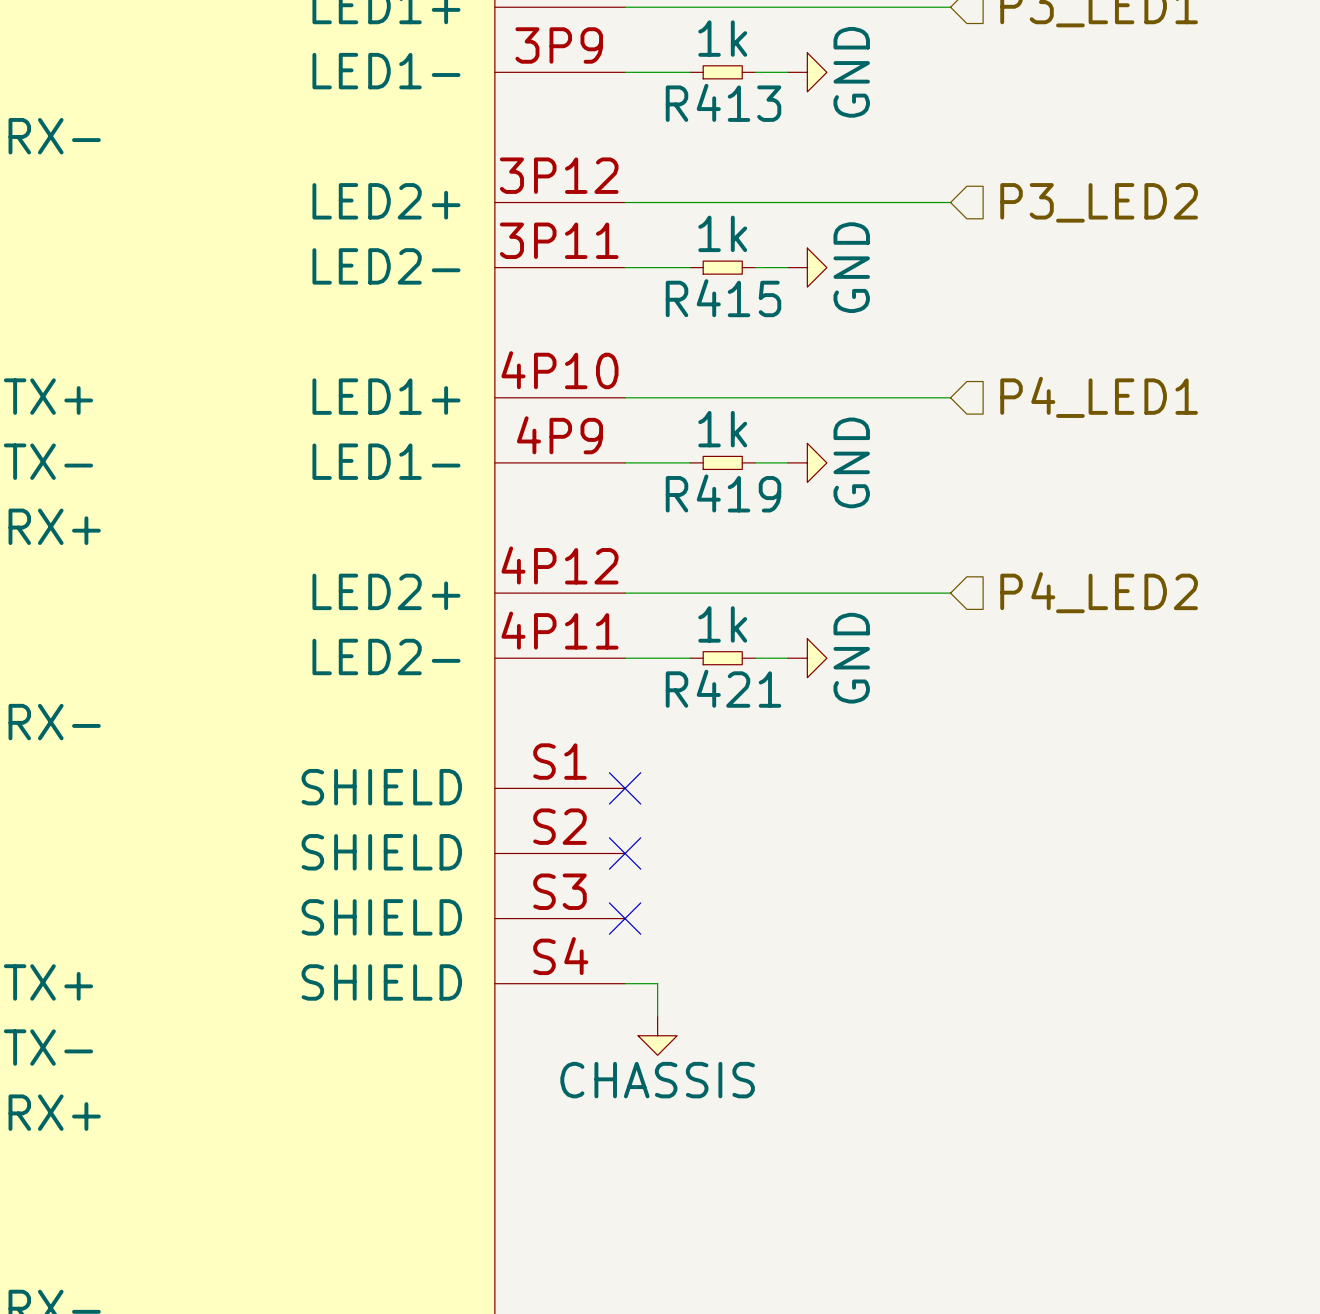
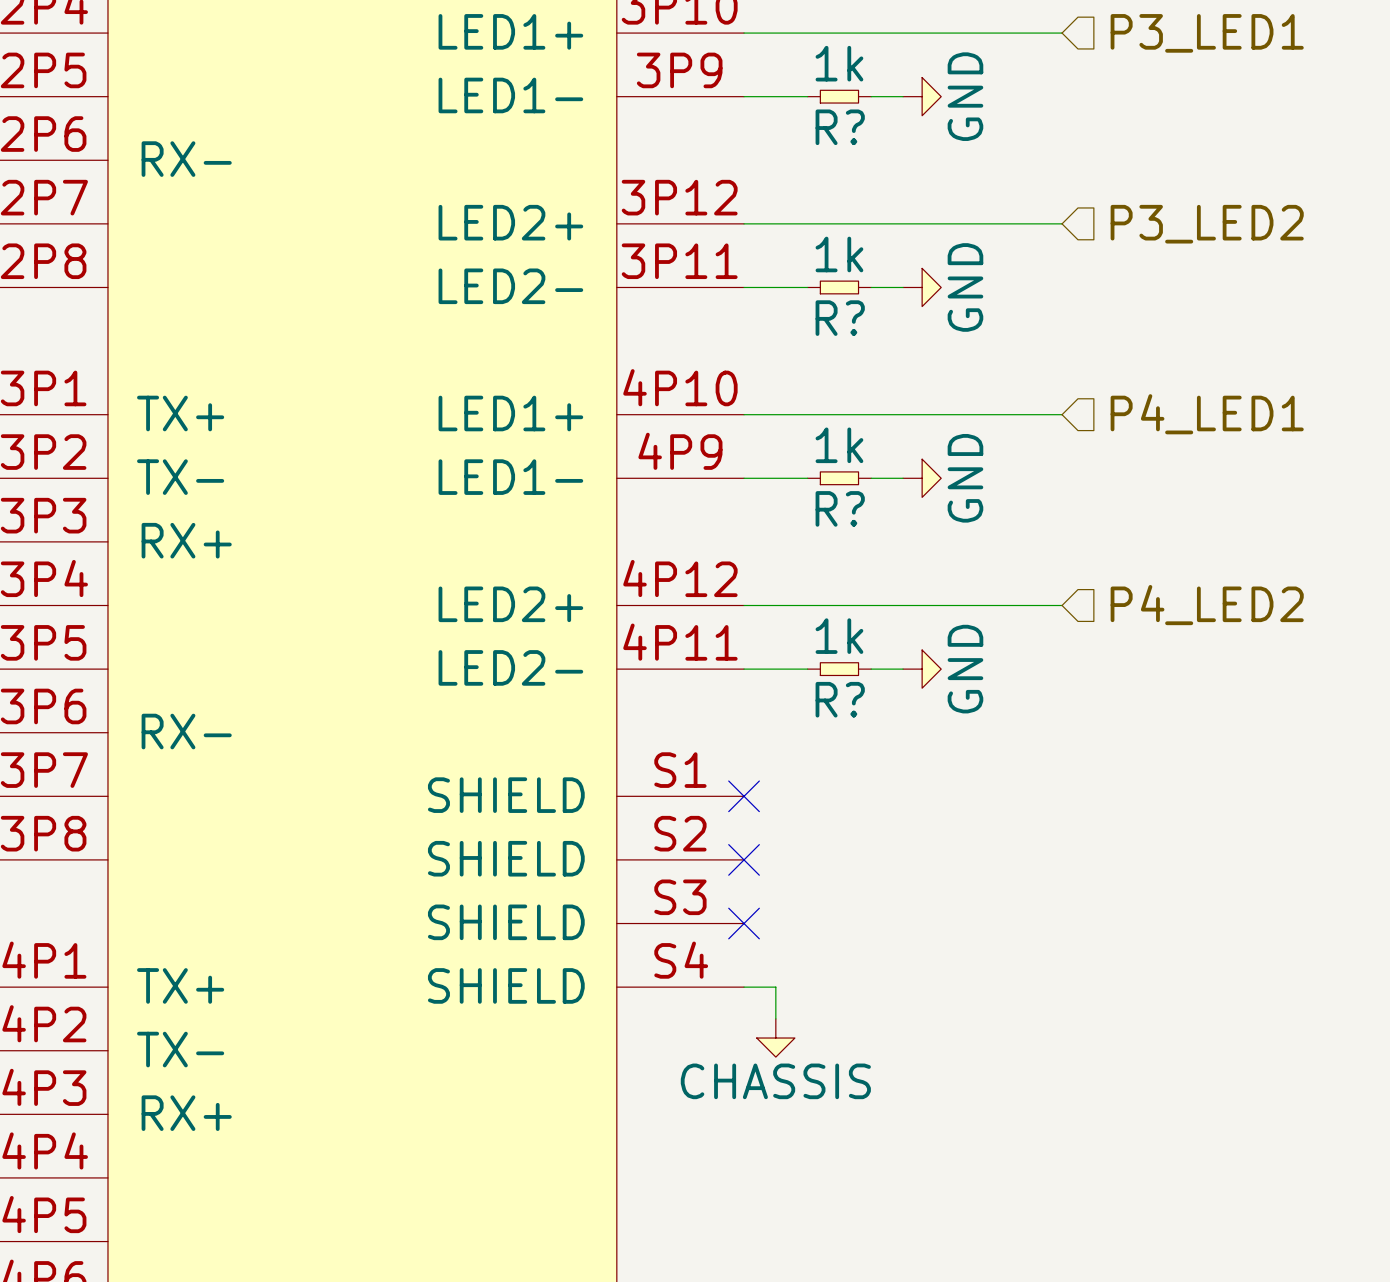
R413 name: R413 (723, 102) -> R? (840, 127)
R415 name: R415 (723, 298) -> R? (840, 318)
R419 name: R419 (723, 493) -> R? (840, 508)
R421 name: R421 (723, 688) -> R? (840, 699)

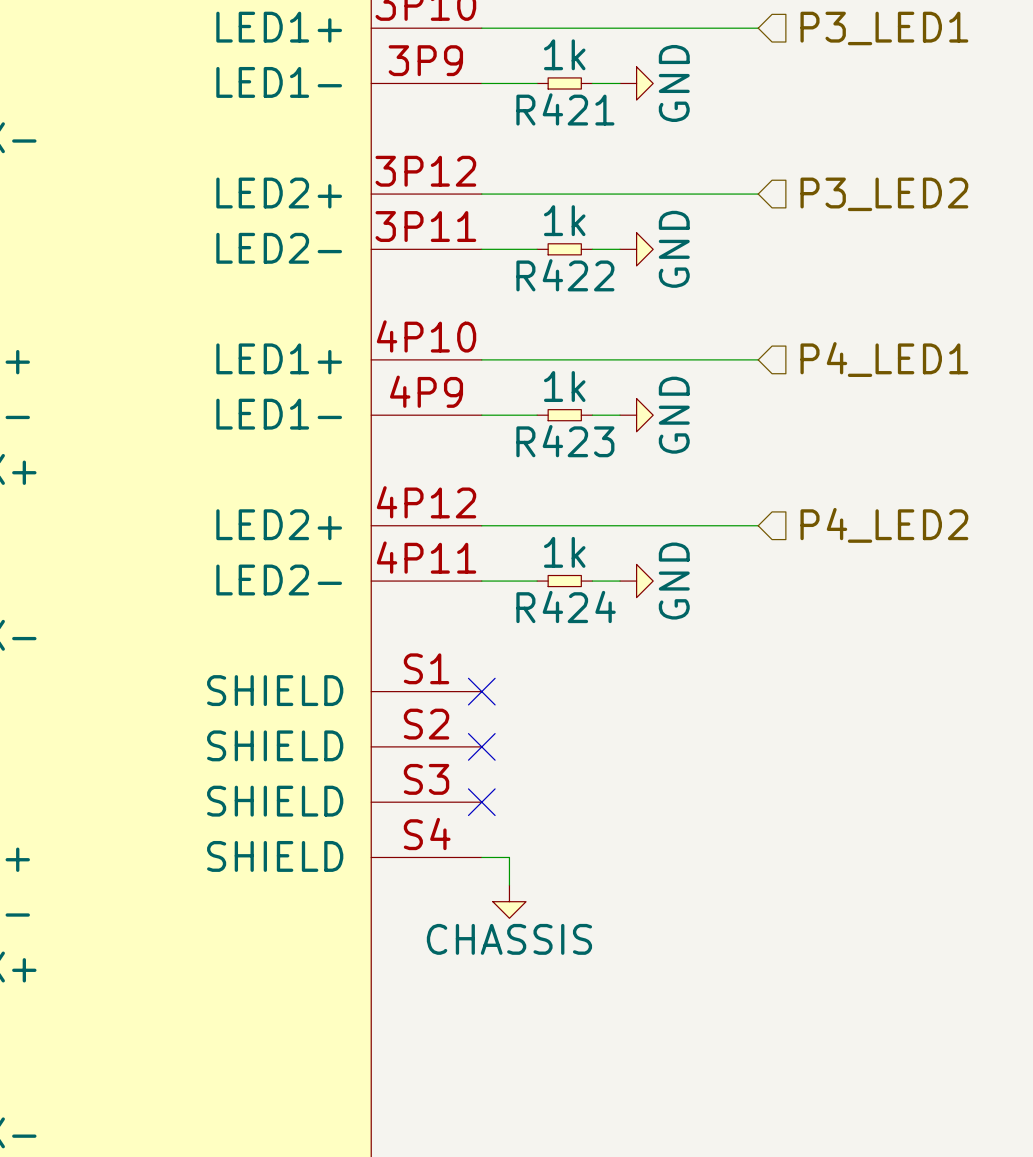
R? name: R? (840, 127) -> R421 (565, 109)
R? name: R? (840, 318) -> R422 (565, 275)
R? name: R? (840, 508) -> R423 (565, 441)
R? name: R? (840, 699) -> R424 (566, 606)

